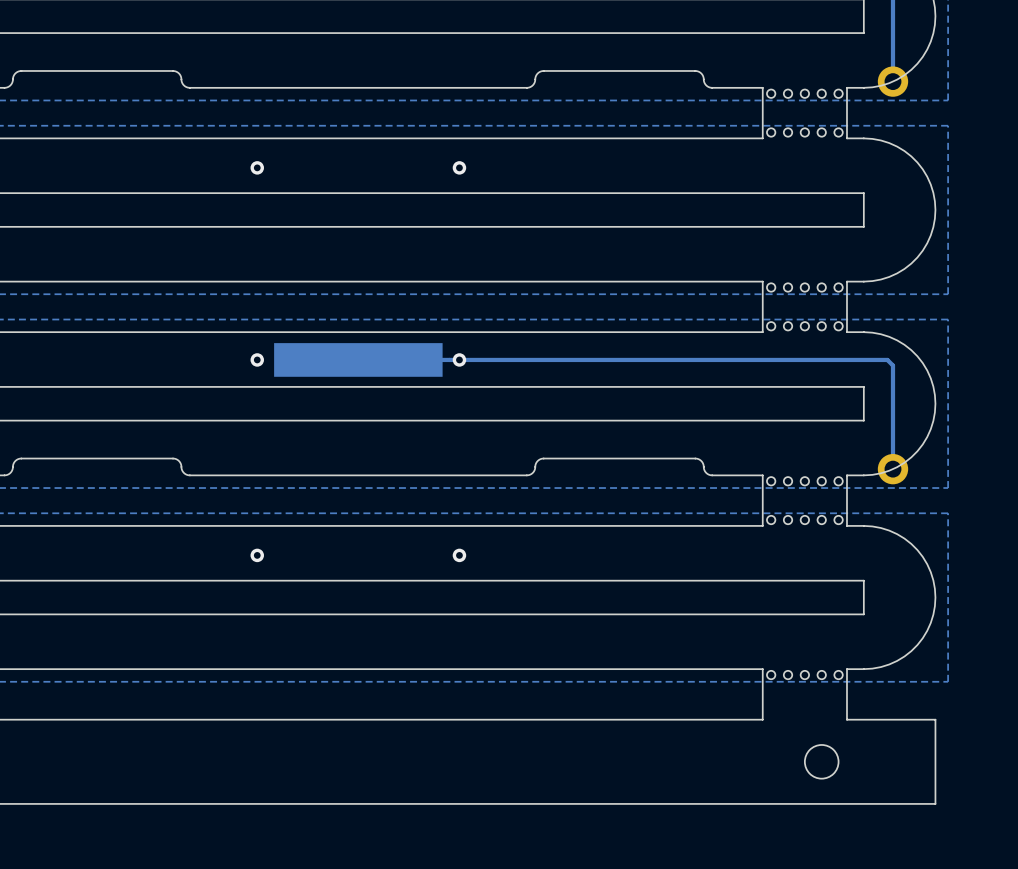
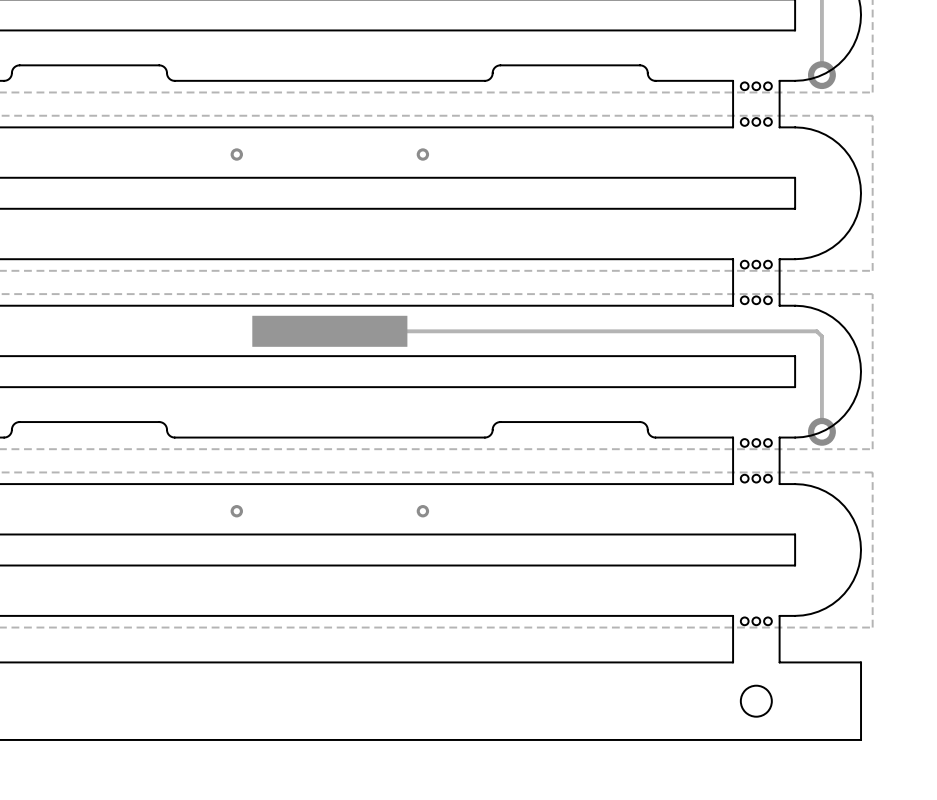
board edge: (762, 87) (762, 138) -> (702, 80) (733, 80) (733, 127) (702, 127)
part footprint: [766, 89, 843, 137] -> [740, 82, 772, 126]
board edge: (762, 281) (762, 332) -> (702, 259) (733, 259) (733, 305) (702, 305)
part footprint: [766, 283, 843, 331] -> [740, 260, 772, 305]
via: (257, 359) -> none
via: (459, 359) -> none
board edge: (762, 475) (762, 525) -> (702, 437) (733, 437) (733, 484) (702, 484)
part footprint: [766, 477, 843, 525] -> [740, 439, 772, 483]
board edge: (762, 669) (762, 719) -> (702, 615) (733, 615) (733, 662) (702, 662)
part footprint: [766, 670, 843, 680] -> [740, 617, 772, 626]

